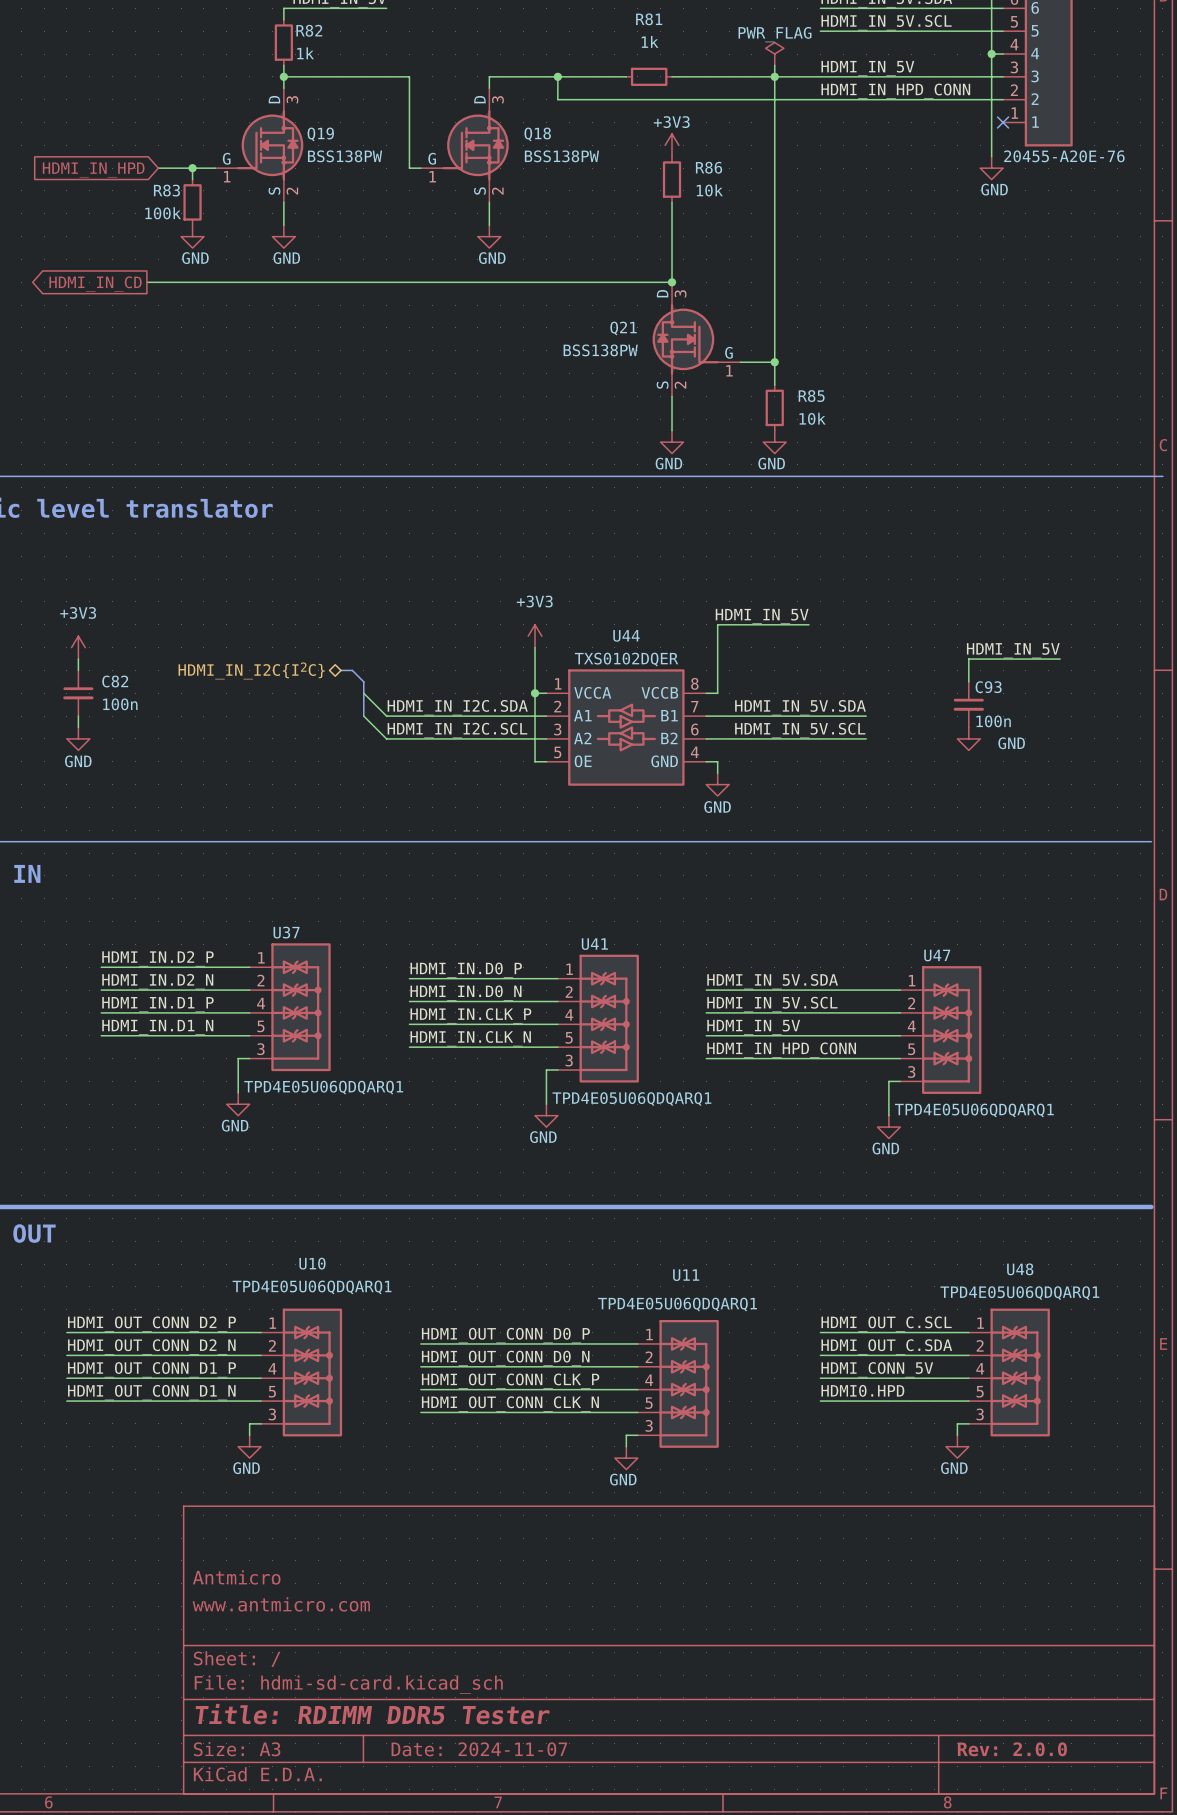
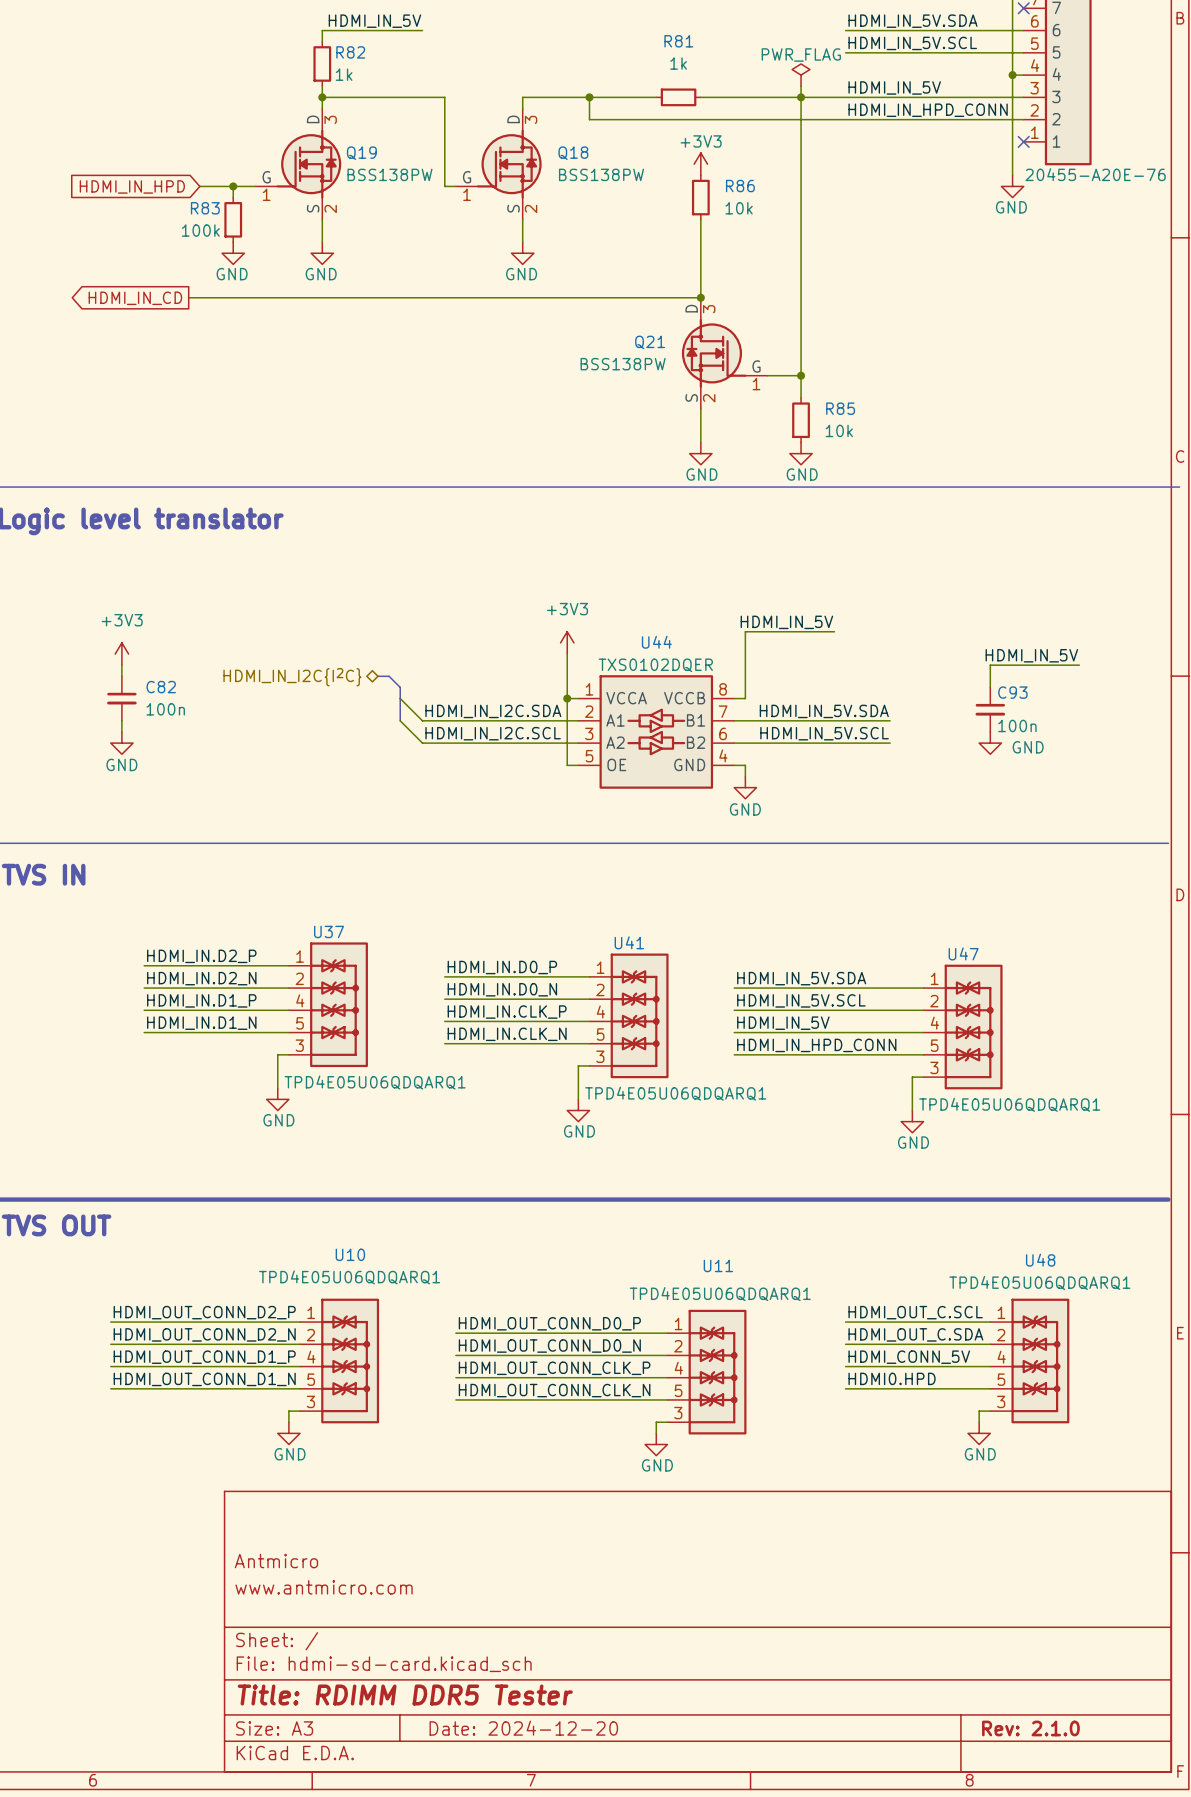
title block: Date: 2024-11-07 (479, 1749) -> Date: 2024-12-20 (523, 1728)
title block: Rev: 2.0.0 (1012, 1749) -> Rev: 2.1.0 (1030, 1728)

